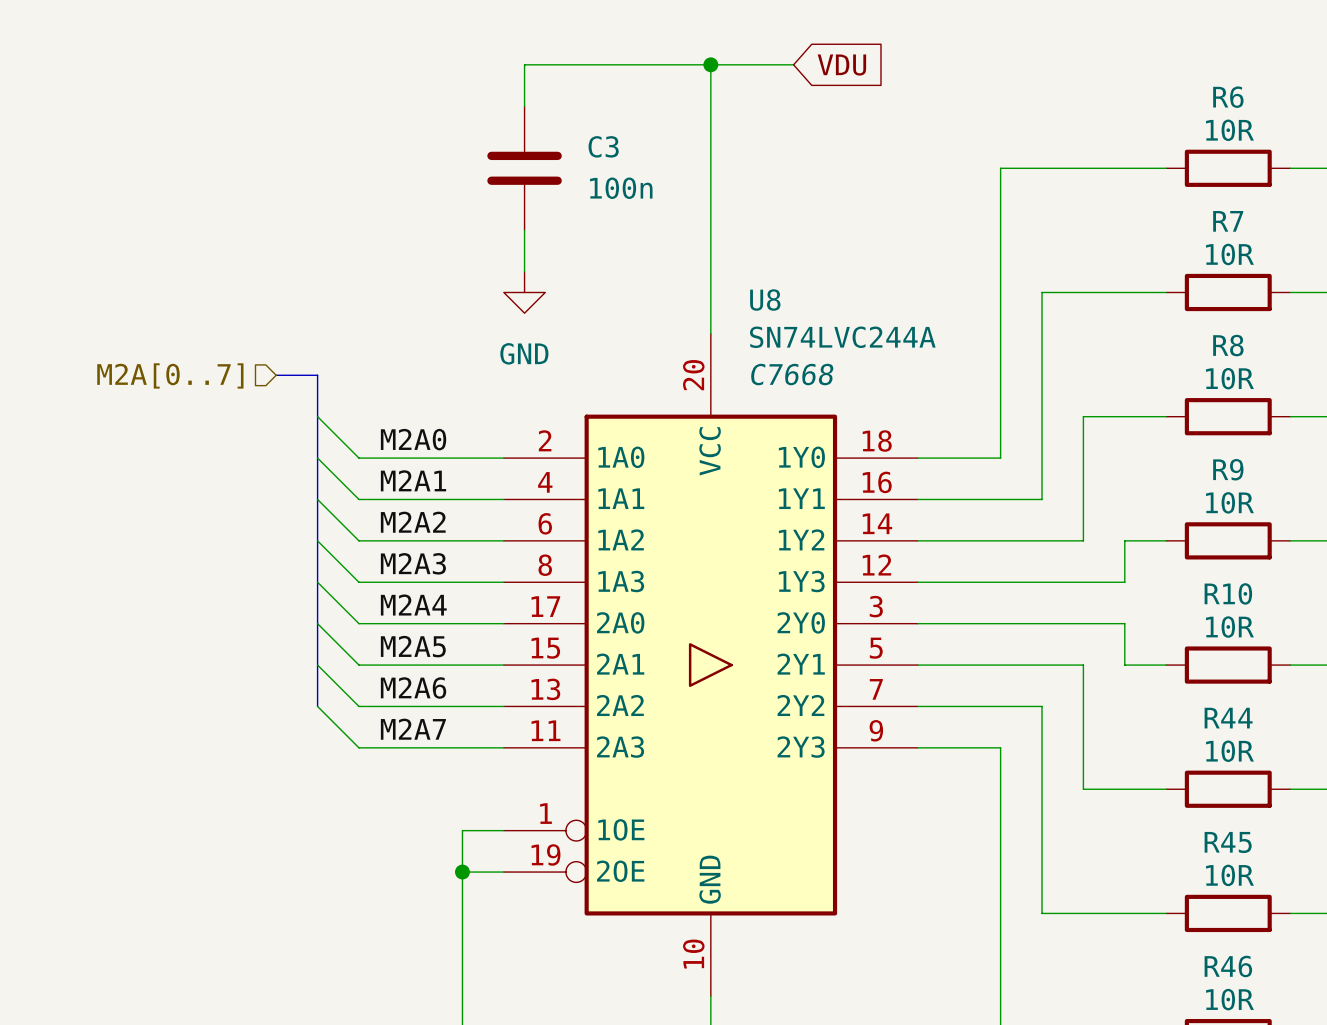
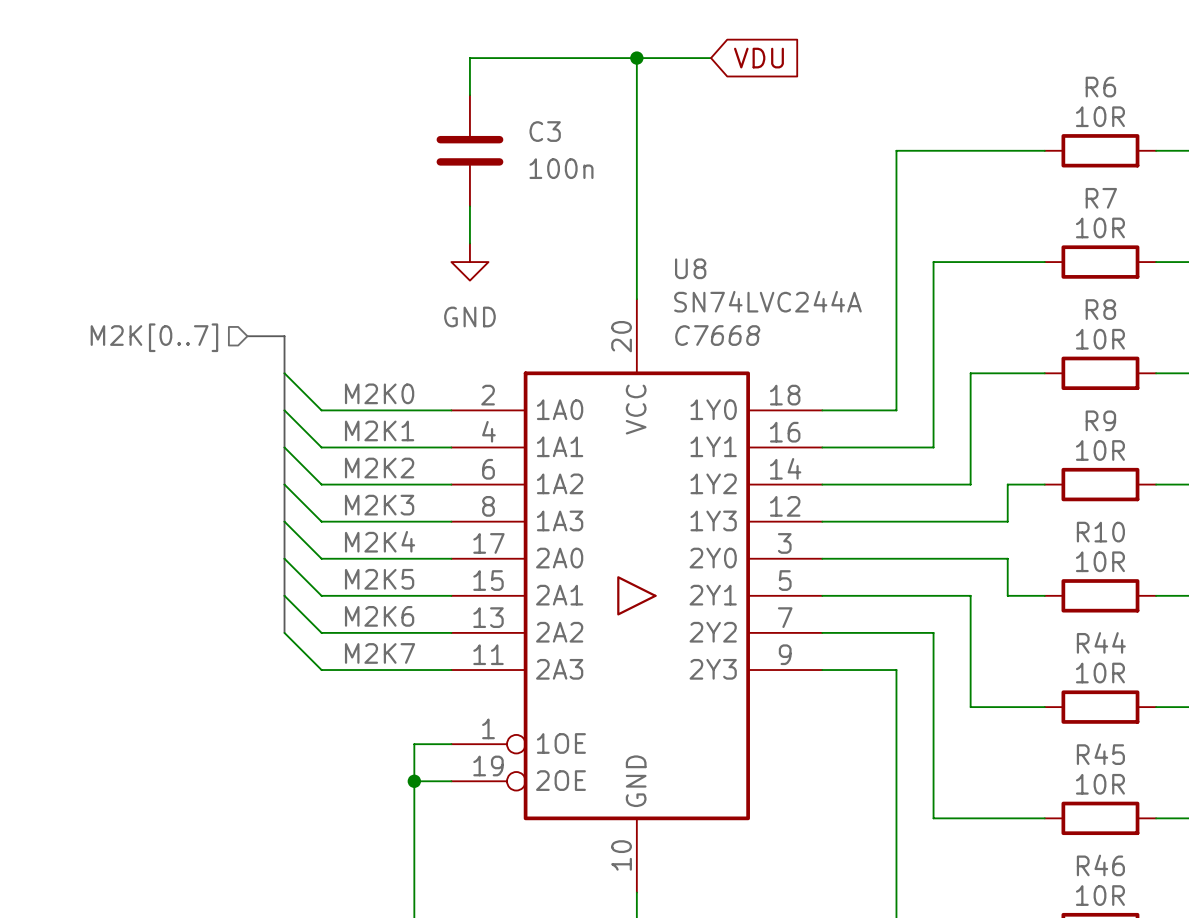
hierarchical label: M2A[0..7] (170, 375) -> M2K[0..7] (154, 337)
label: M2A0 (413, 439) -> M2K0 (379, 393)
label: M2A1 (413, 480) -> M2K1 (379, 430)
label: M2A2 (413, 522) -> M2K2 (379, 468)
label: M2A3 (413, 563) -> M2K3 (379, 505)
label: M2A4 (413, 605) -> M2K4 (380, 541)
label: M2A5 (413, 646) -> M2K5 (379, 579)
label: M2A6 (413, 688) -> M2K6 (379, 616)
label: M2A7 (413, 729) -> M2K7 (380, 653)

